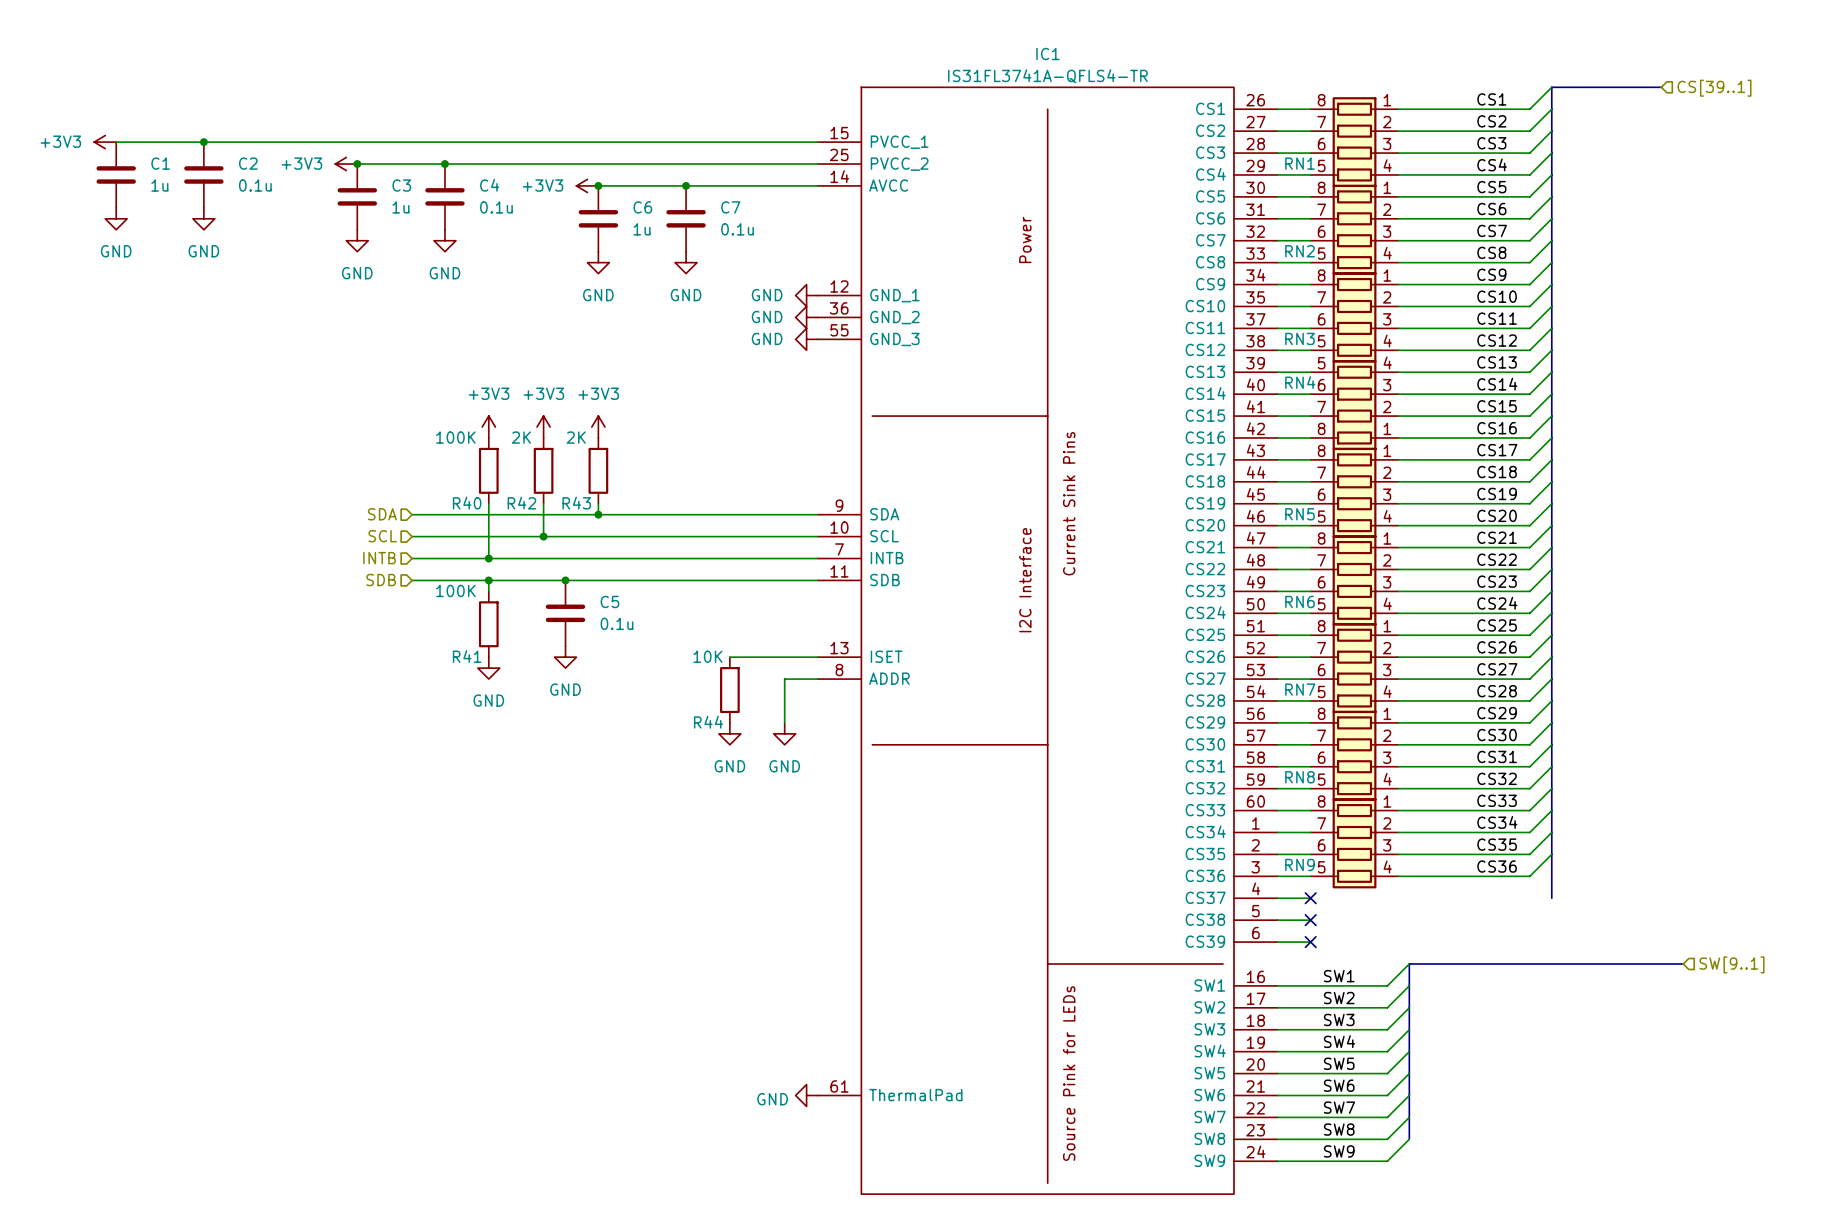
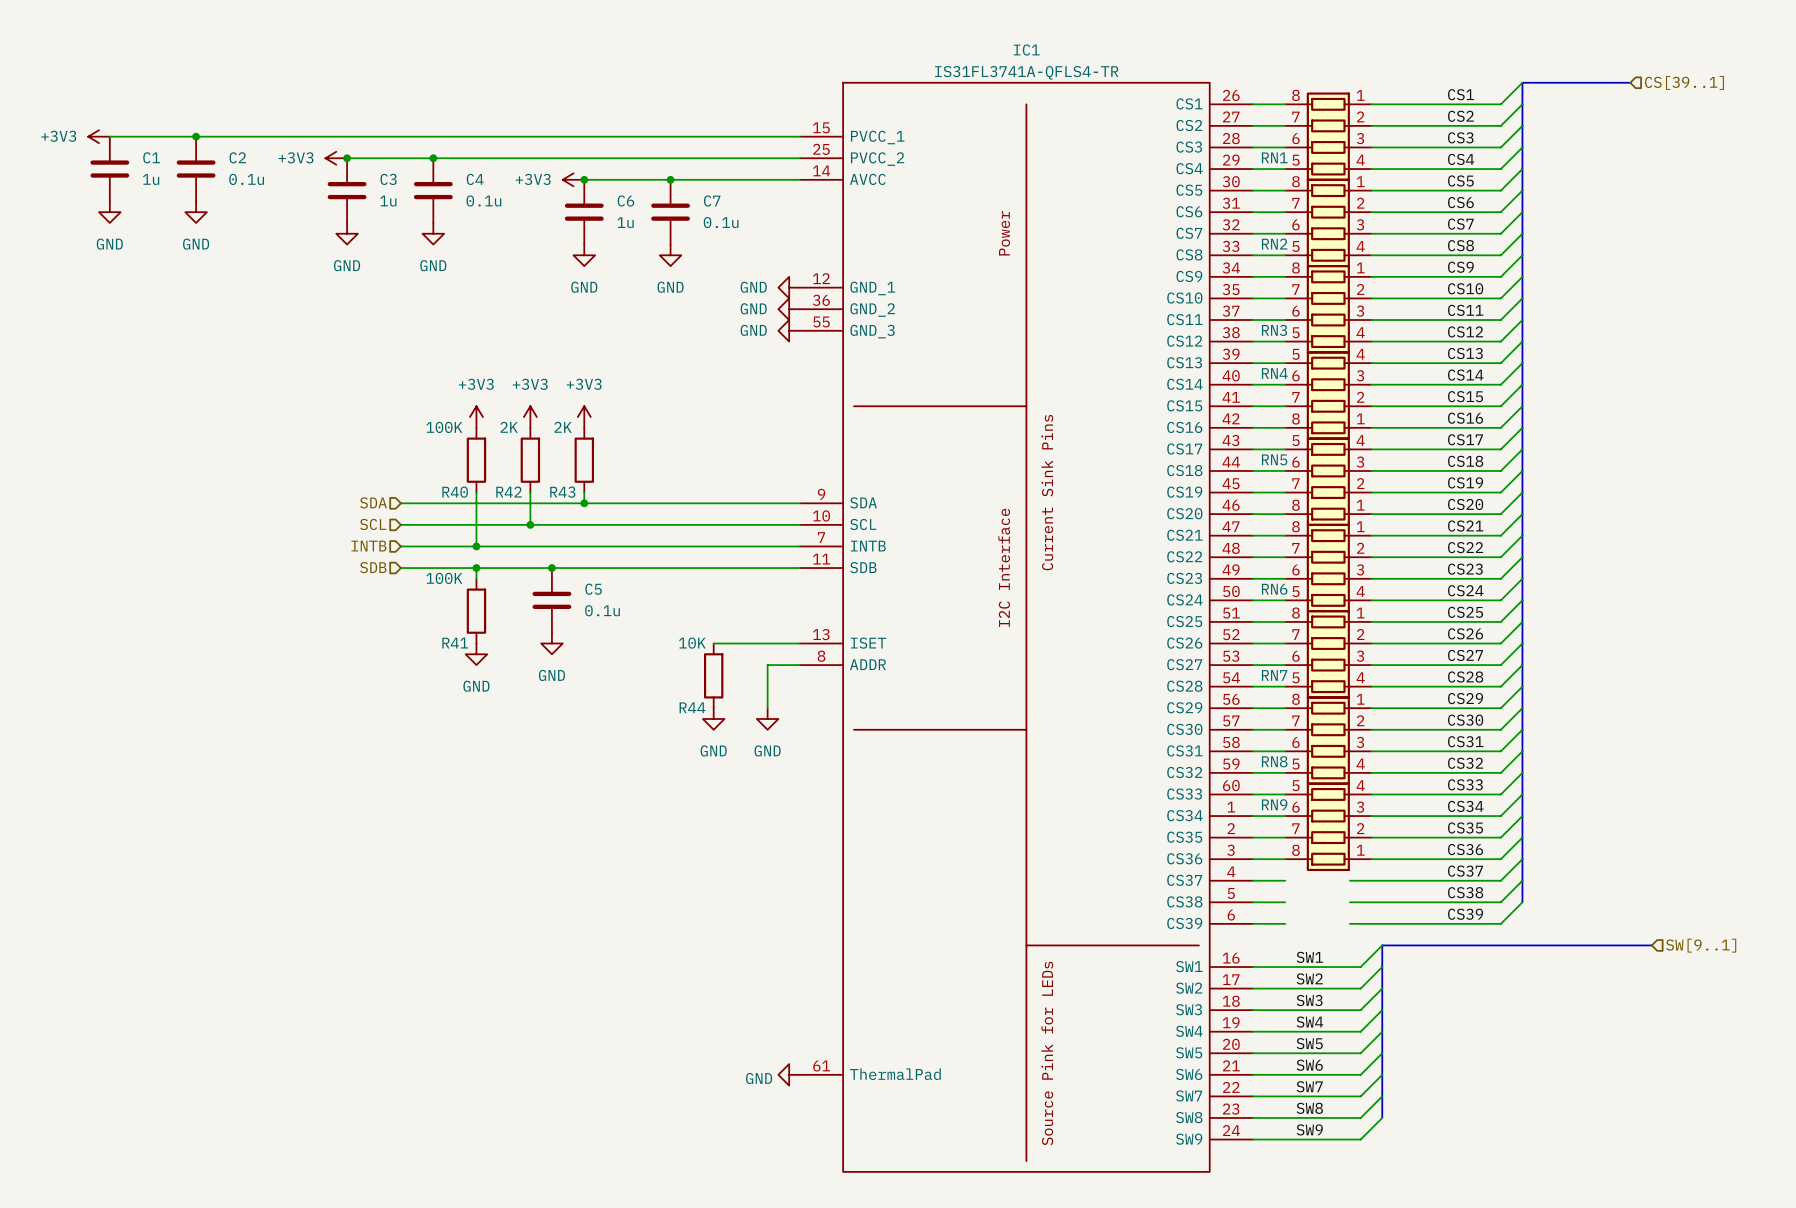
RN5 flip: as is (1354, 492) -> up-down (1328, 481)
RN9 flip: as is (1354, 843) -> up-down (1328, 826)
wire: none -> (1522, 859) (1500, 880) (1349, 880)
label: none -> CS37 (1465, 871)
no-connect mark: (1310, 898) -> none
wire: none -> (1522, 880) (1500, 902) (1349, 902)
bus: none -> (1522, 880) (1522, 902)
label: none -> CS38 (1465, 892)
no-connect mark: (1310, 920) -> none
wire: none -> (1522, 902) (1500, 923) (1349, 923)
label: none -> CS39 (1465, 914)
no-connect mark: (1310, 942) -> none

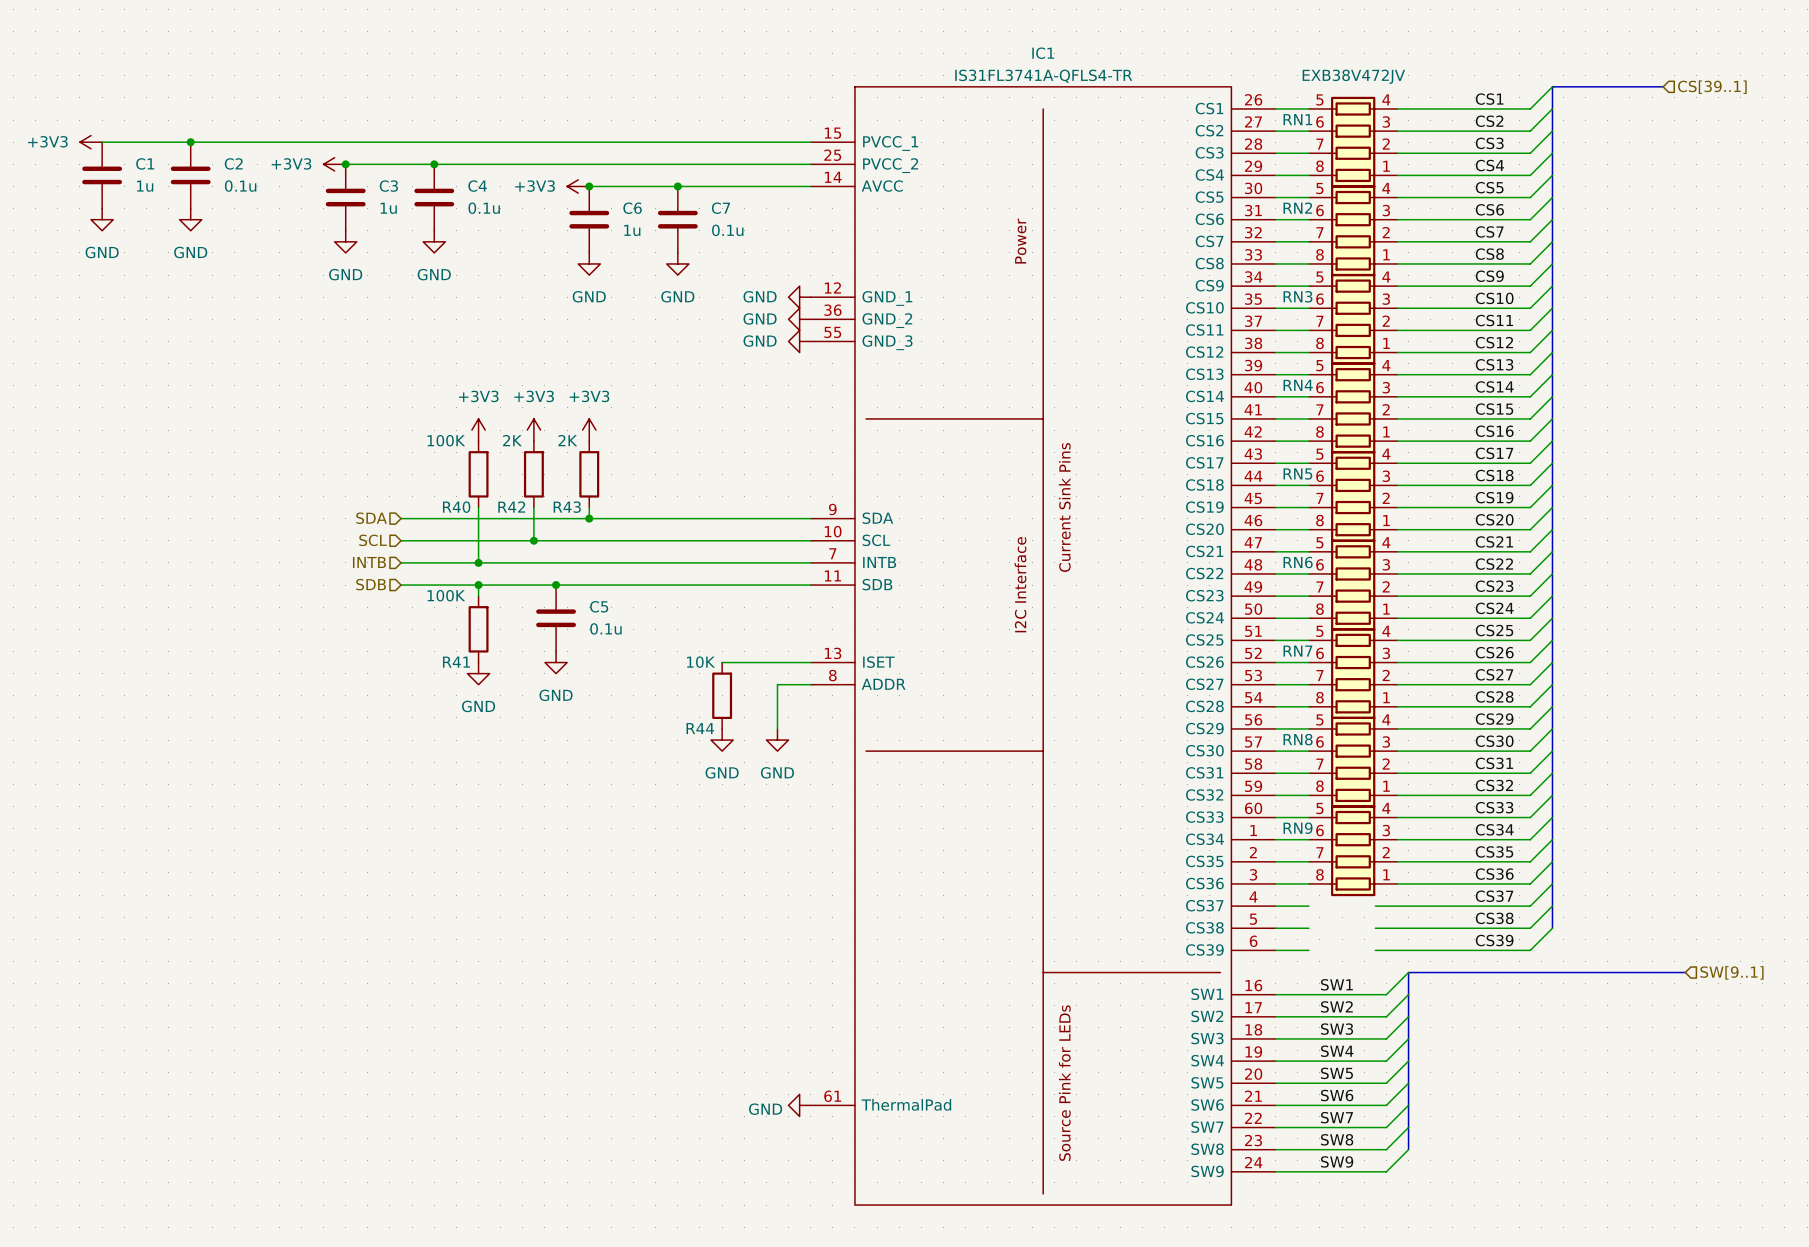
RN1 value: none -> EXB38V472JV (1353, 76)
RN1 flip: as is (1328, 136) -> up-down (1353, 142)
RN2 flip: as is (1328, 222) -> up-down (1353, 230)
RN3 flip: as is (1328, 309) -> up-down (1353, 319)
RN6 flip: as is (1328, 568) -> up-down (1353, 585)
RN7 flip: as is (1328, 654) -> up-down (1353, 673)
RN8 flip: as is (1328, 740) -> up-down (1353, 762)

